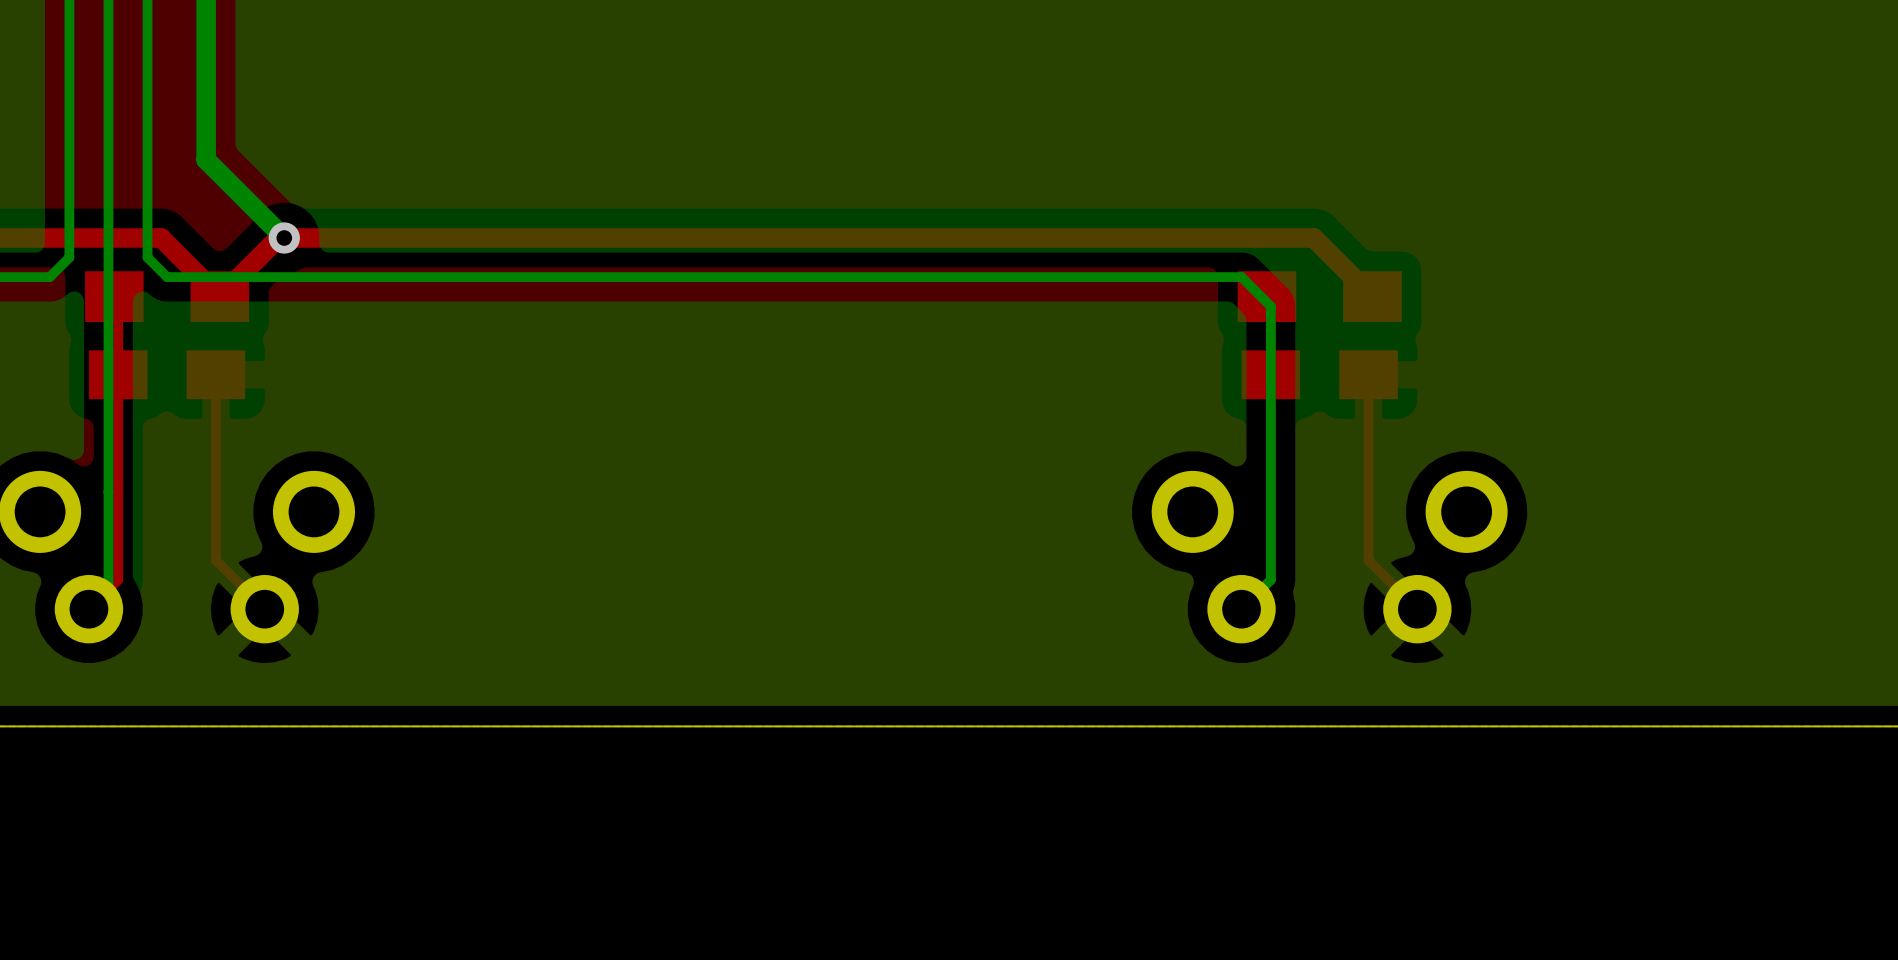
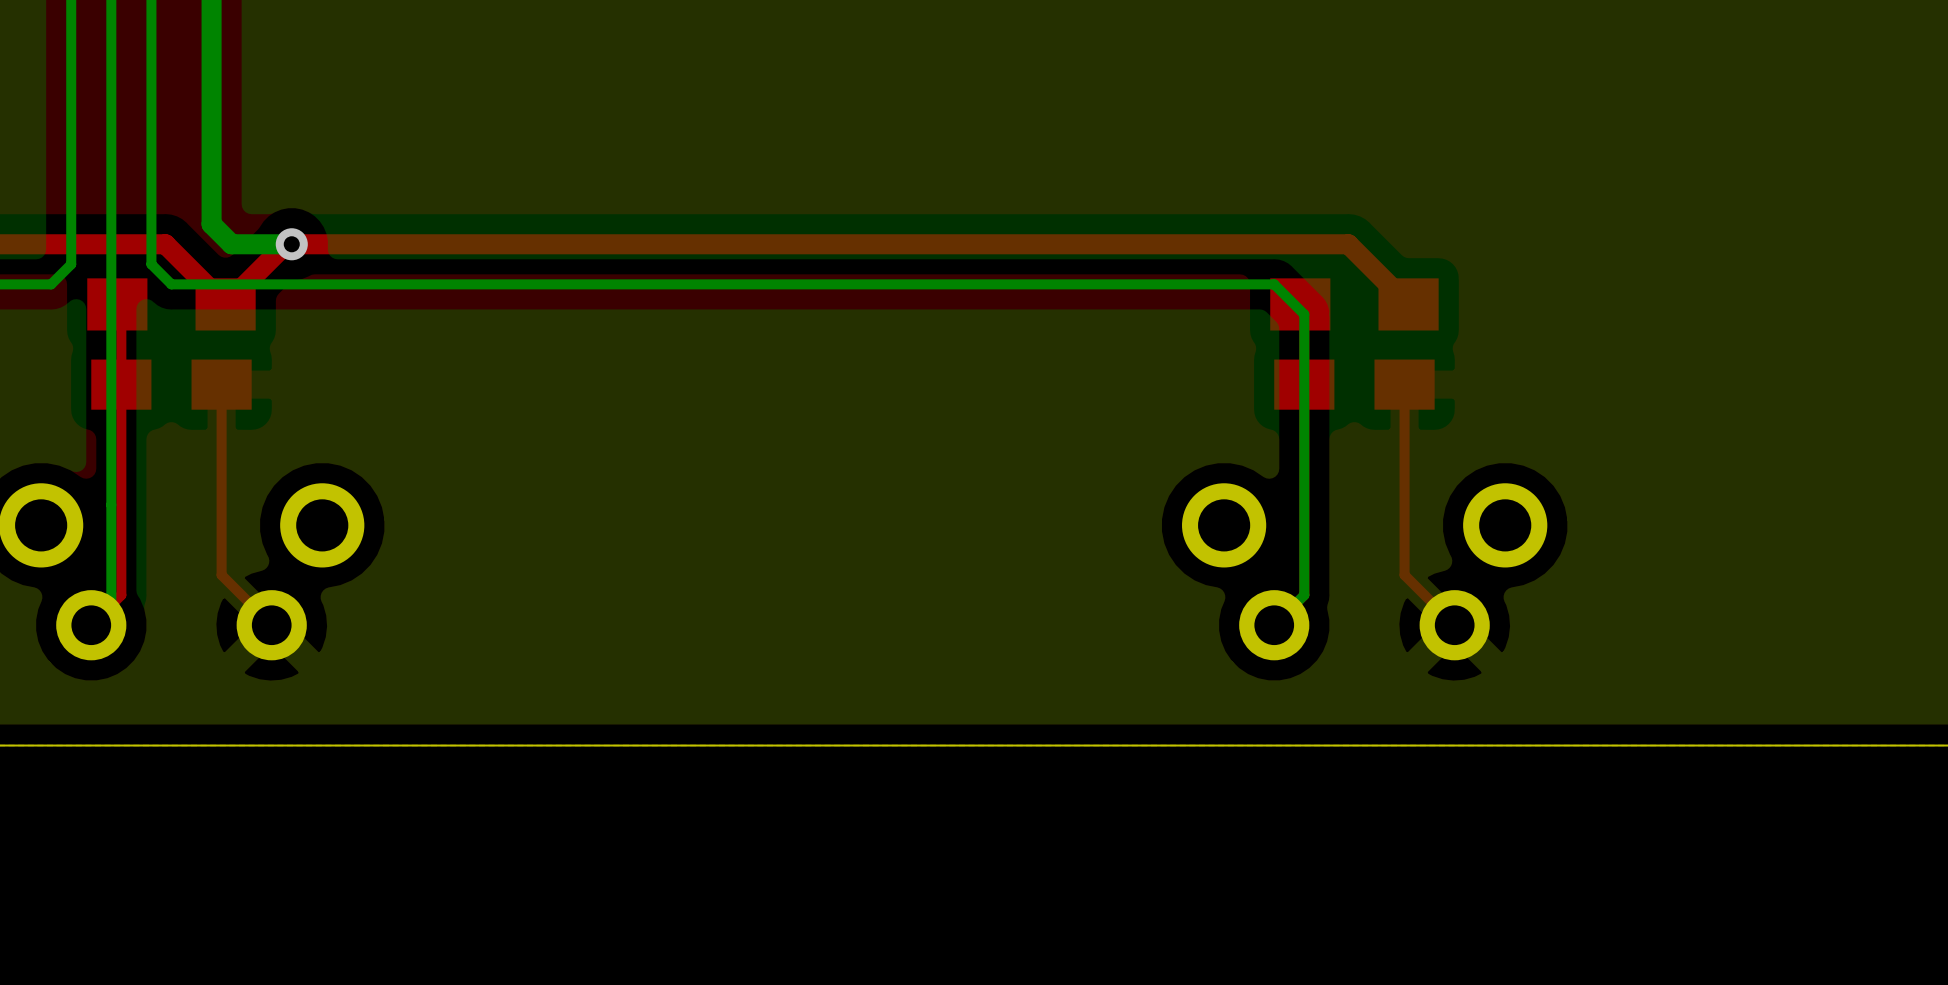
bottom track: (206, 159) (284, 238) -> (211, 164) (211, 224) (231, 244) (291, 244)

